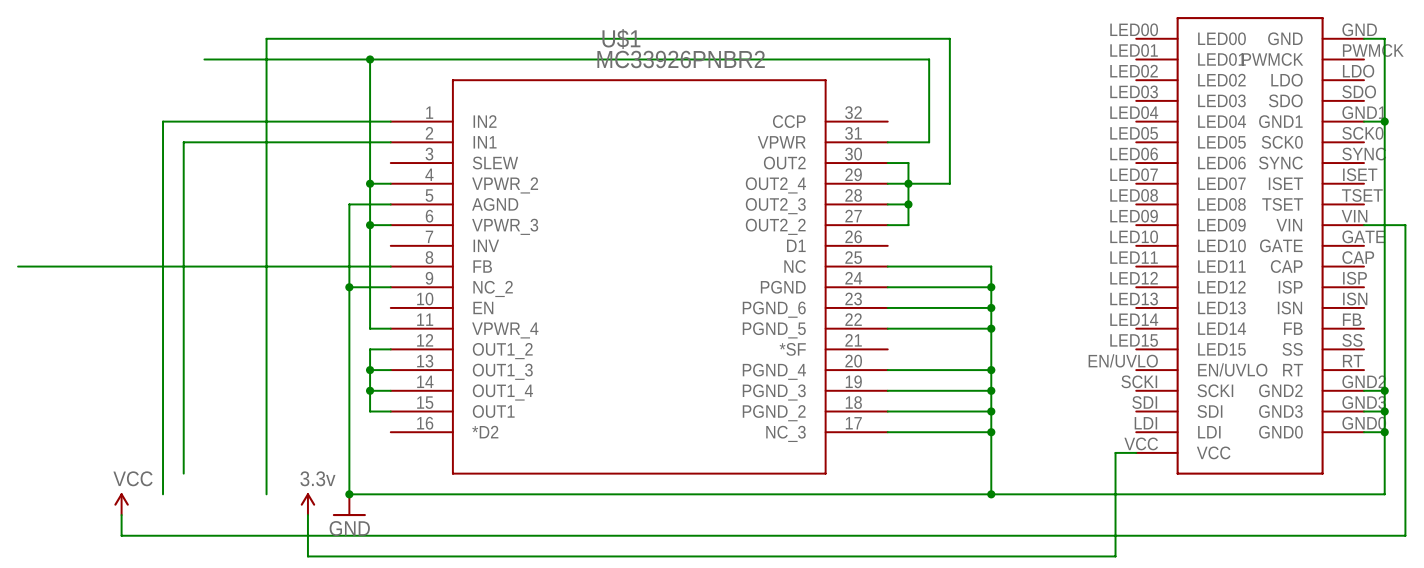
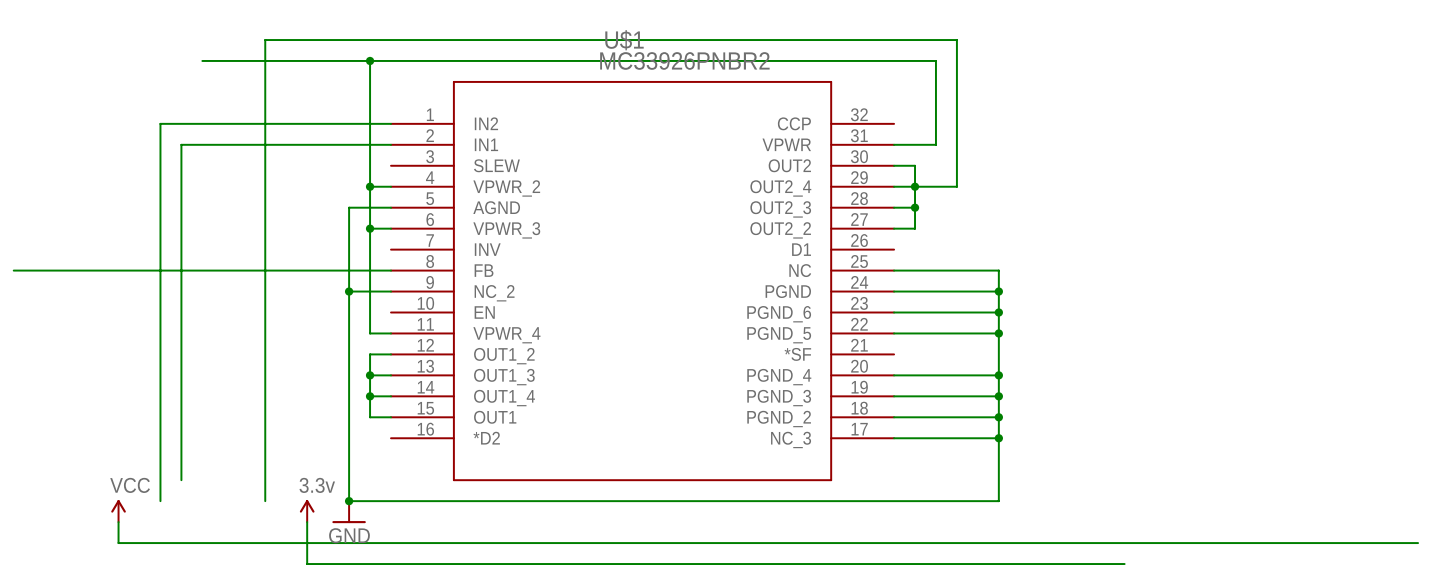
wire: (1364, 38) (1384, 38) (1384, 494) (991, 494) -> none
wire: (1364, 121) (1384, 121) -> none
junction: (1384, 121) -> none
wire: (1364, 225) (1405, 225) (1405, 535) -> none
part: (1250, 245) -> none
wire: (1364, 390) (1384, 390) -> none
junction: (1384, 390) -> none
wire: (1364, 411) (1384, 411) -> none
junction: (1384, 411) -> none
wire: (1364, 432) (1384, 432) -> none
junction: (1384, 432) -> none
wire: (1136, 452) (1115, 452) (1115, 556) -> none
junction: (991, 494) -> none

